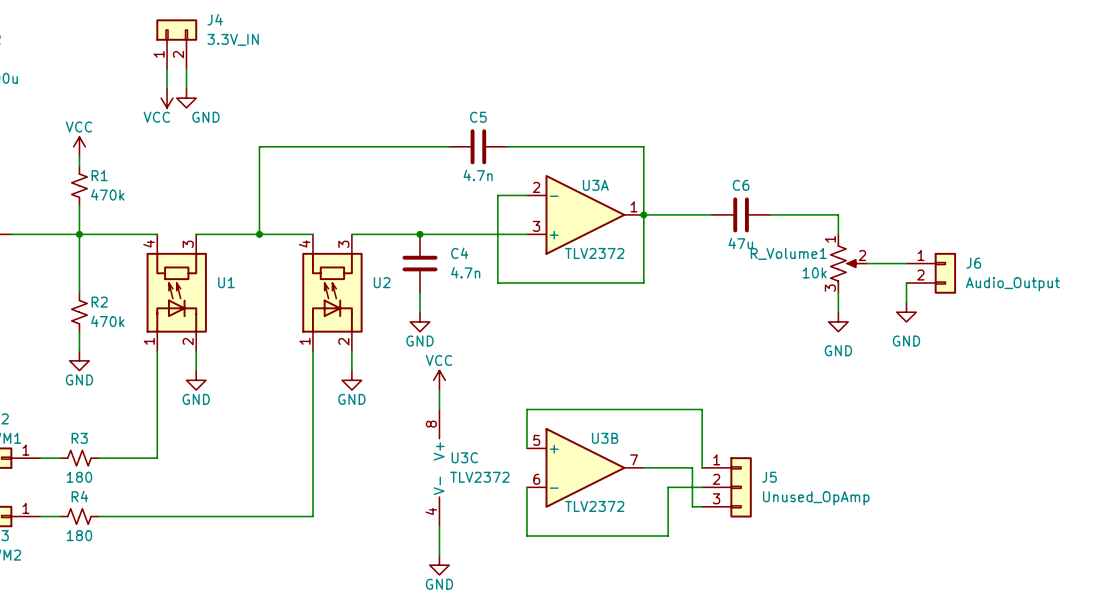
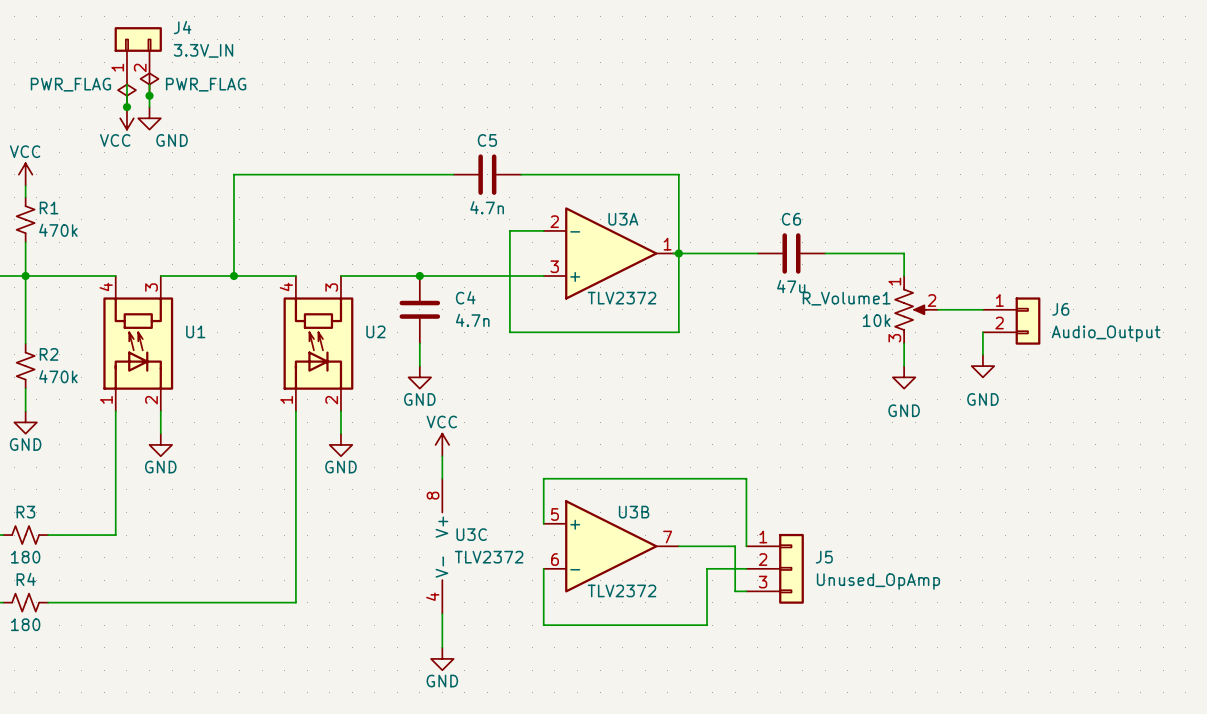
power symbol: none -> PWR_FLAG (149, 84)
power symbol: none -> PWR_FLAG (126, 95)
junction: none -> (149, 95)
junction: none -> (126, 107)

